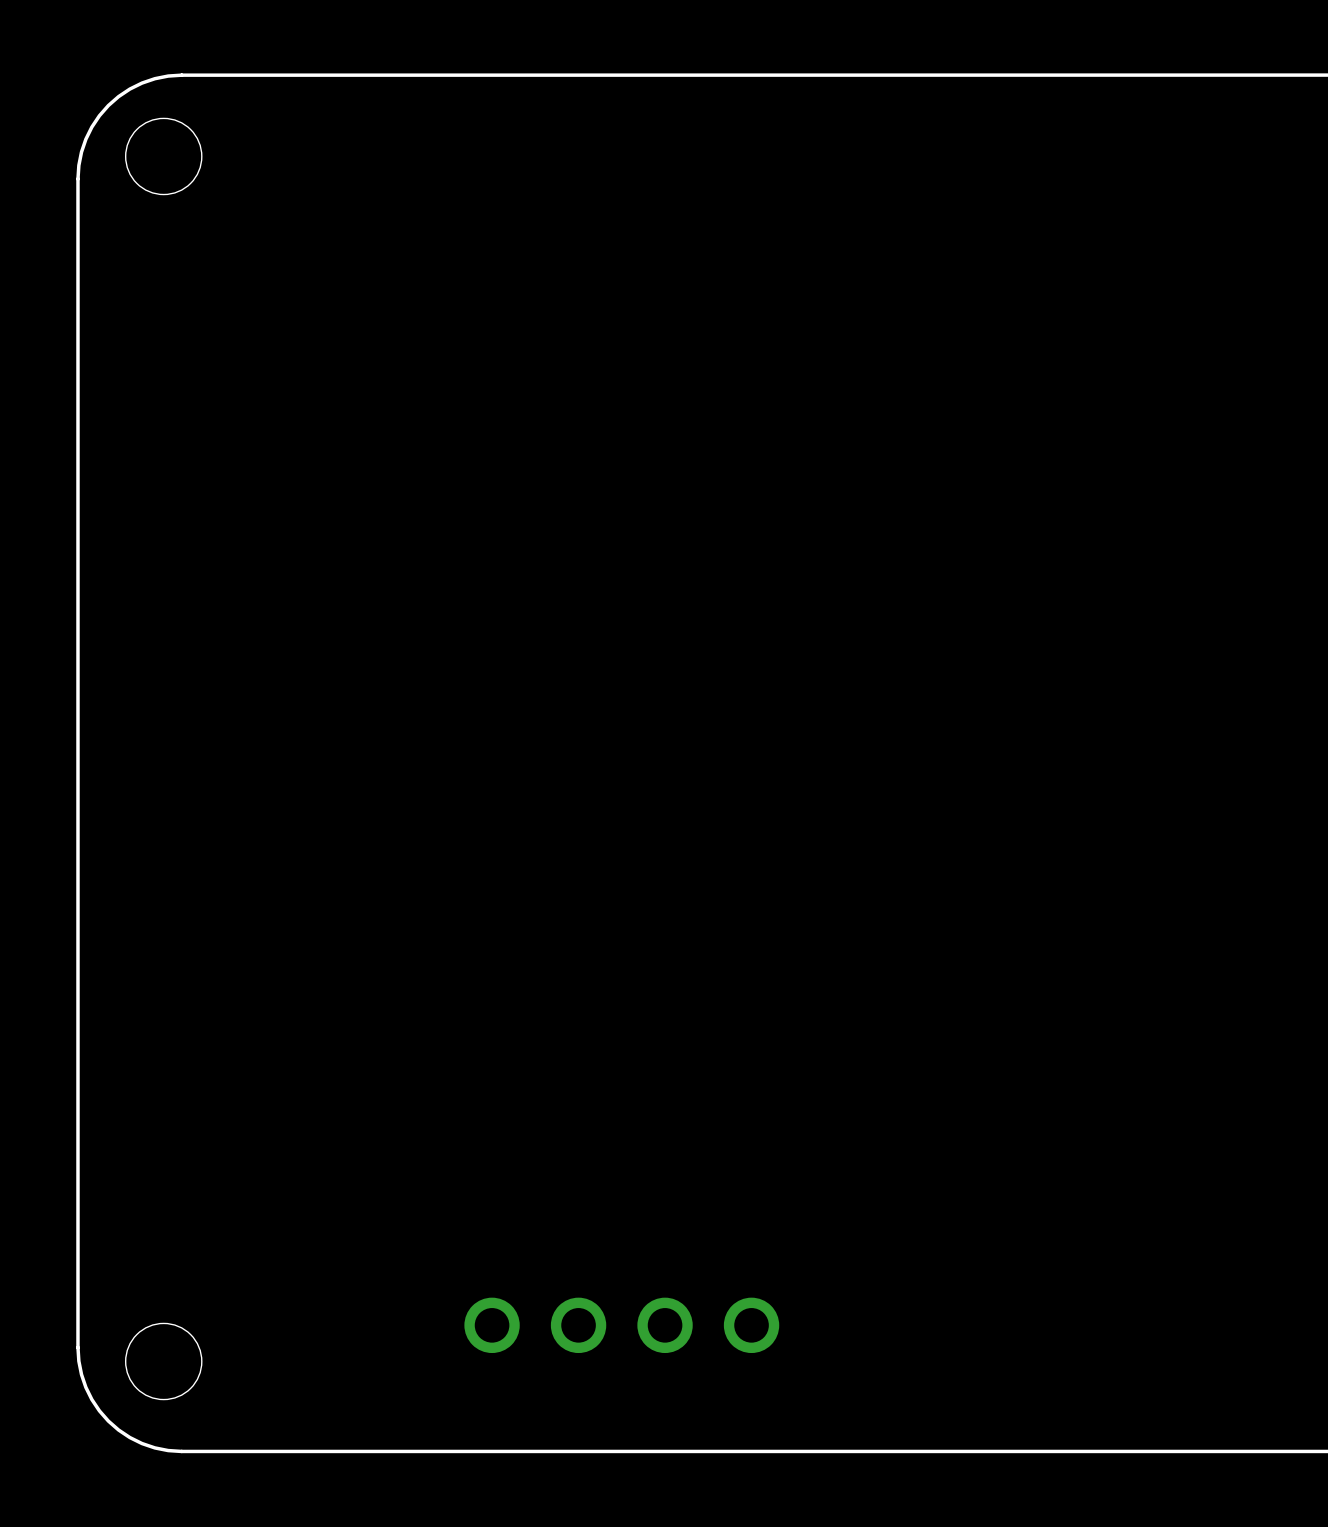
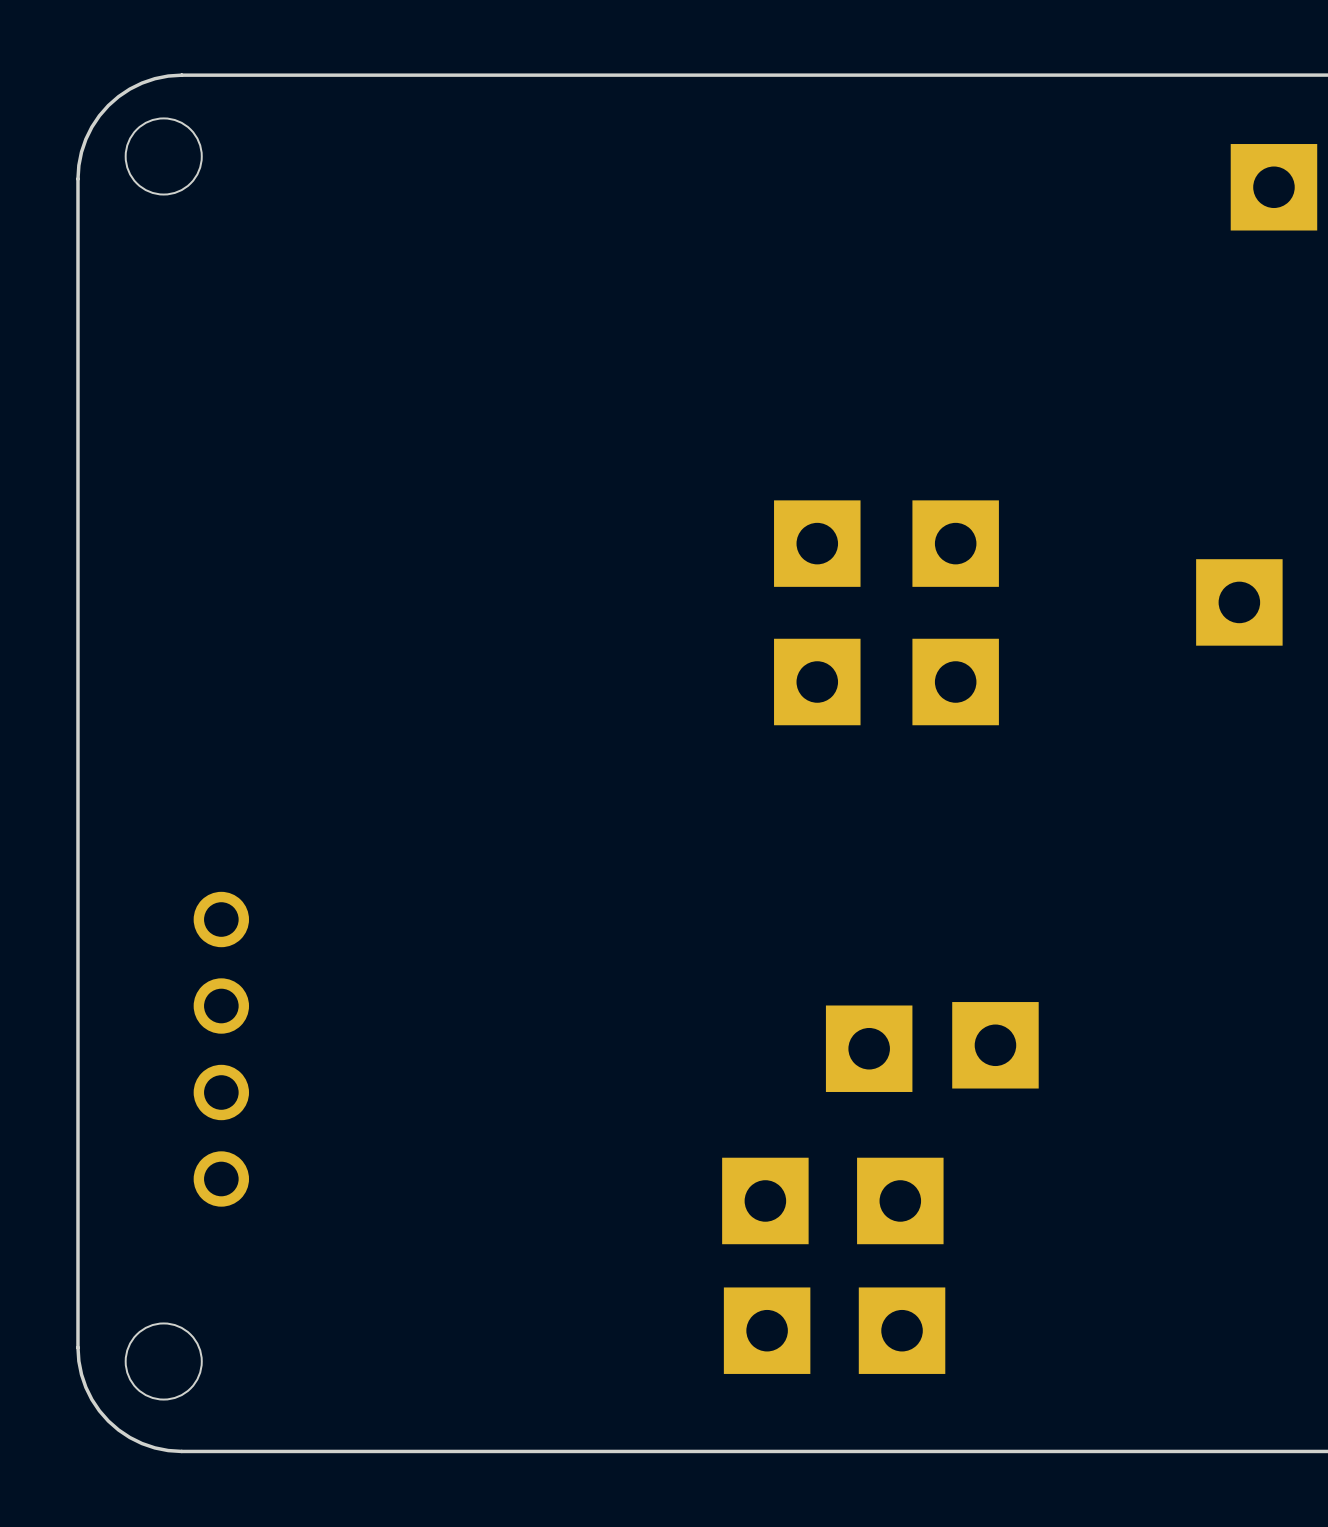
part: none -> (1273, 187)
part: none -> (817, 543)
part: none -> (955, 543)
part: none -> (1239, 602)
part: none -> (817, 682)
part: none -> (955, 682)
part: none -> (995, 1045)
part: none -> (869, 1048)
part: none -> (765, 1200)
part: none -> (900, 1200)
part rotation: 0° (621, 1325) -> 90° clockwise (221, 1049)
part position: (621, 1325) -> (221, 1049)
part: none -> (767, 1330)
part: none -> (902, 1330)

